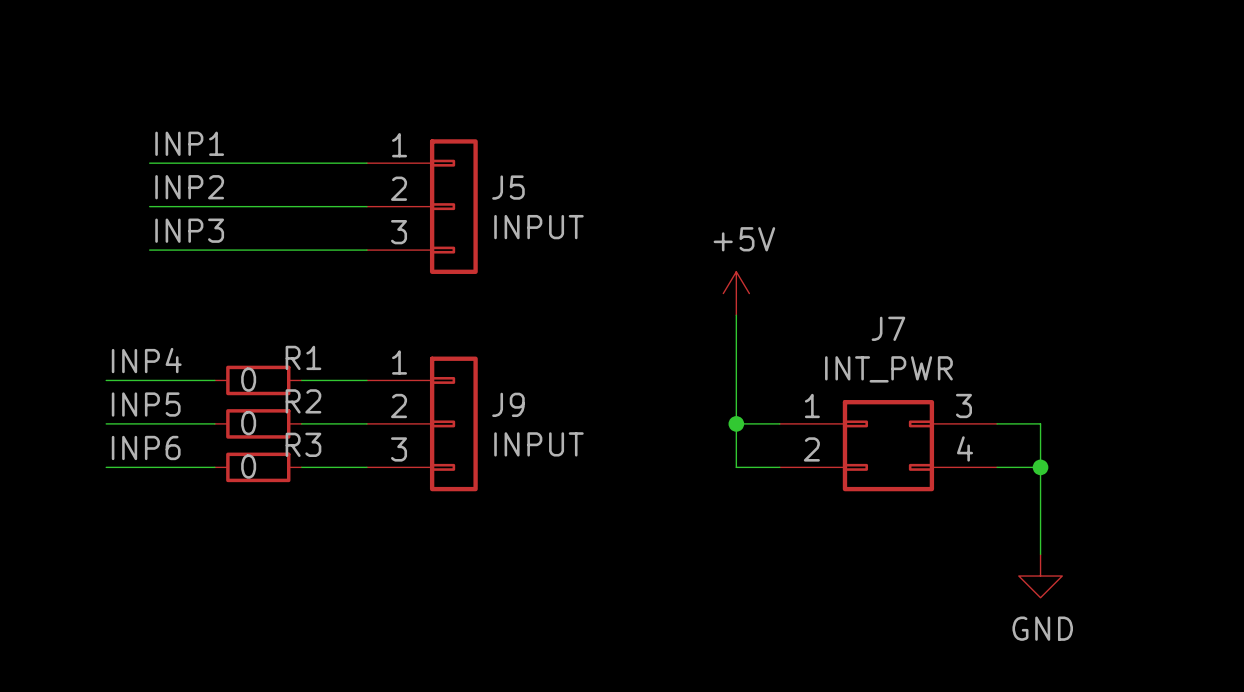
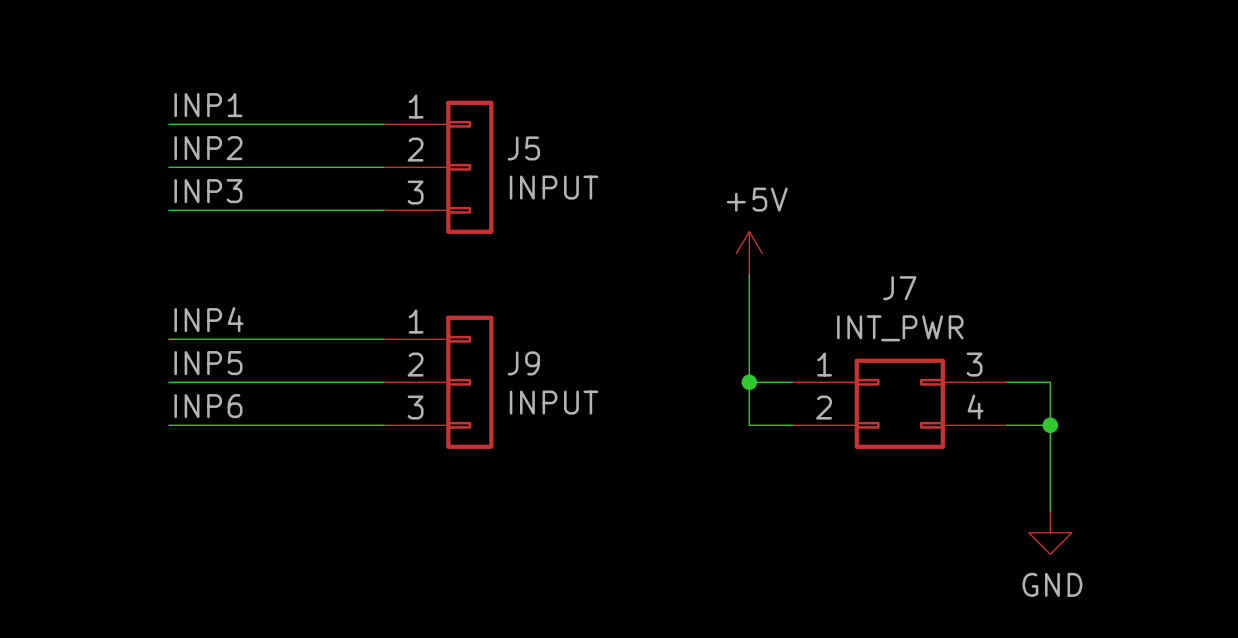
label position: INP4 (146, 360) -> INP4 (208, 319)
wire: (106, 380) (149, 380) -> none
wire: none -> (233, 339) (319, 339)
R1: 0 (258, 380) -> none
label position: INP5 (146, 404) -> INP5 (208, 363)
wire: (106, 423) (149, 423) -> none
wire: none -> (233, 382) (319, 382)
R2: 0 (258, 423) -> none
label position: INP6 (146, 447) -> INP6 (208, 406)
wire: (106, 467) (149, 467) -> none
wire: none -> (233, 425) (319, 425)
R3: 0 (258, 467) -> none

